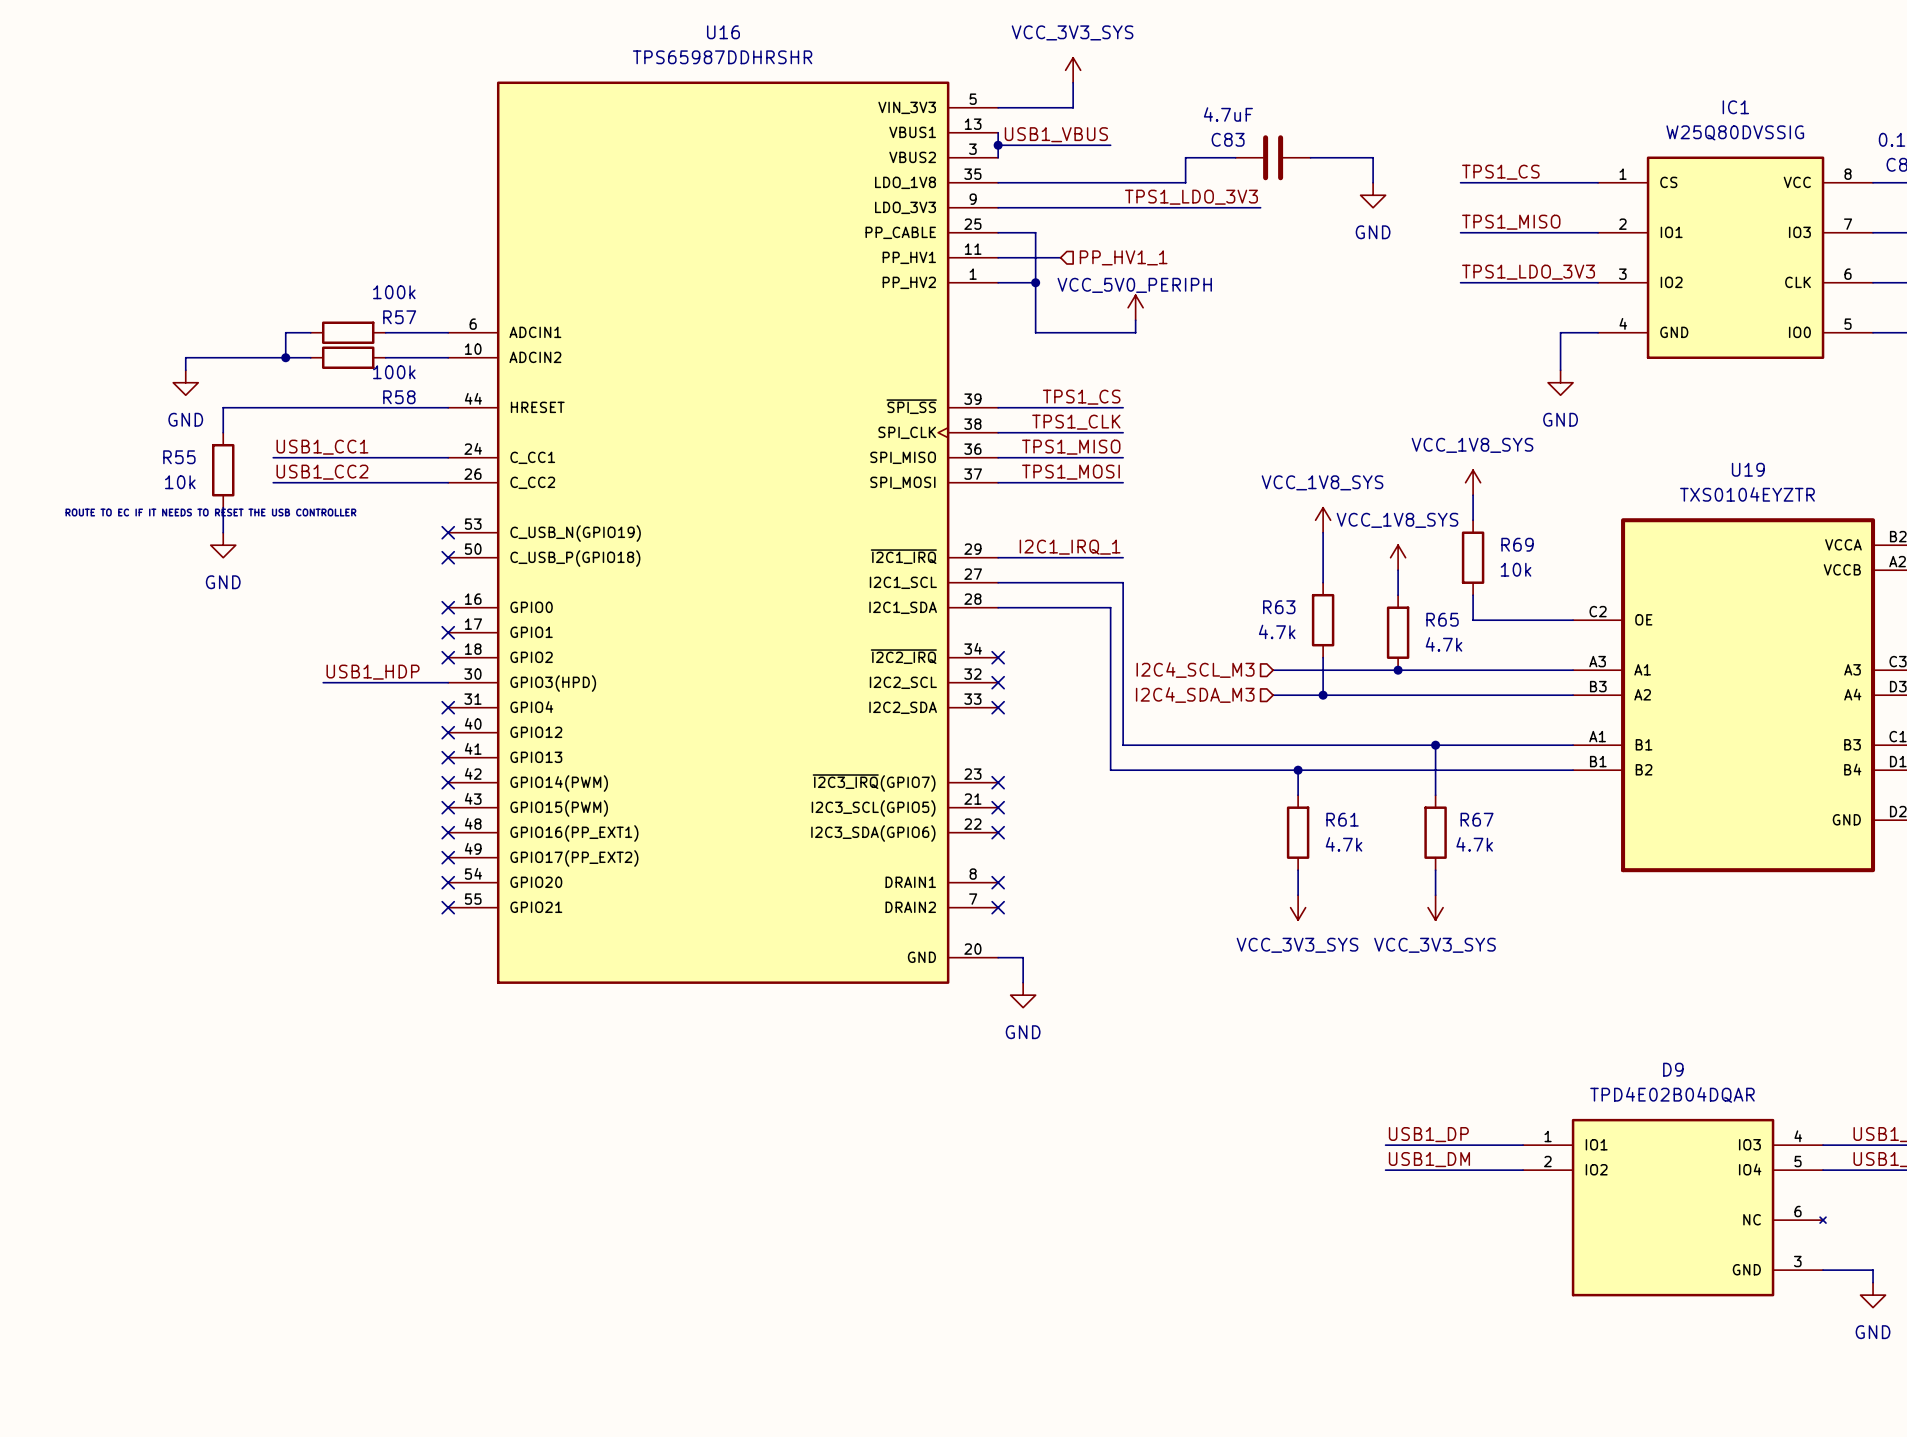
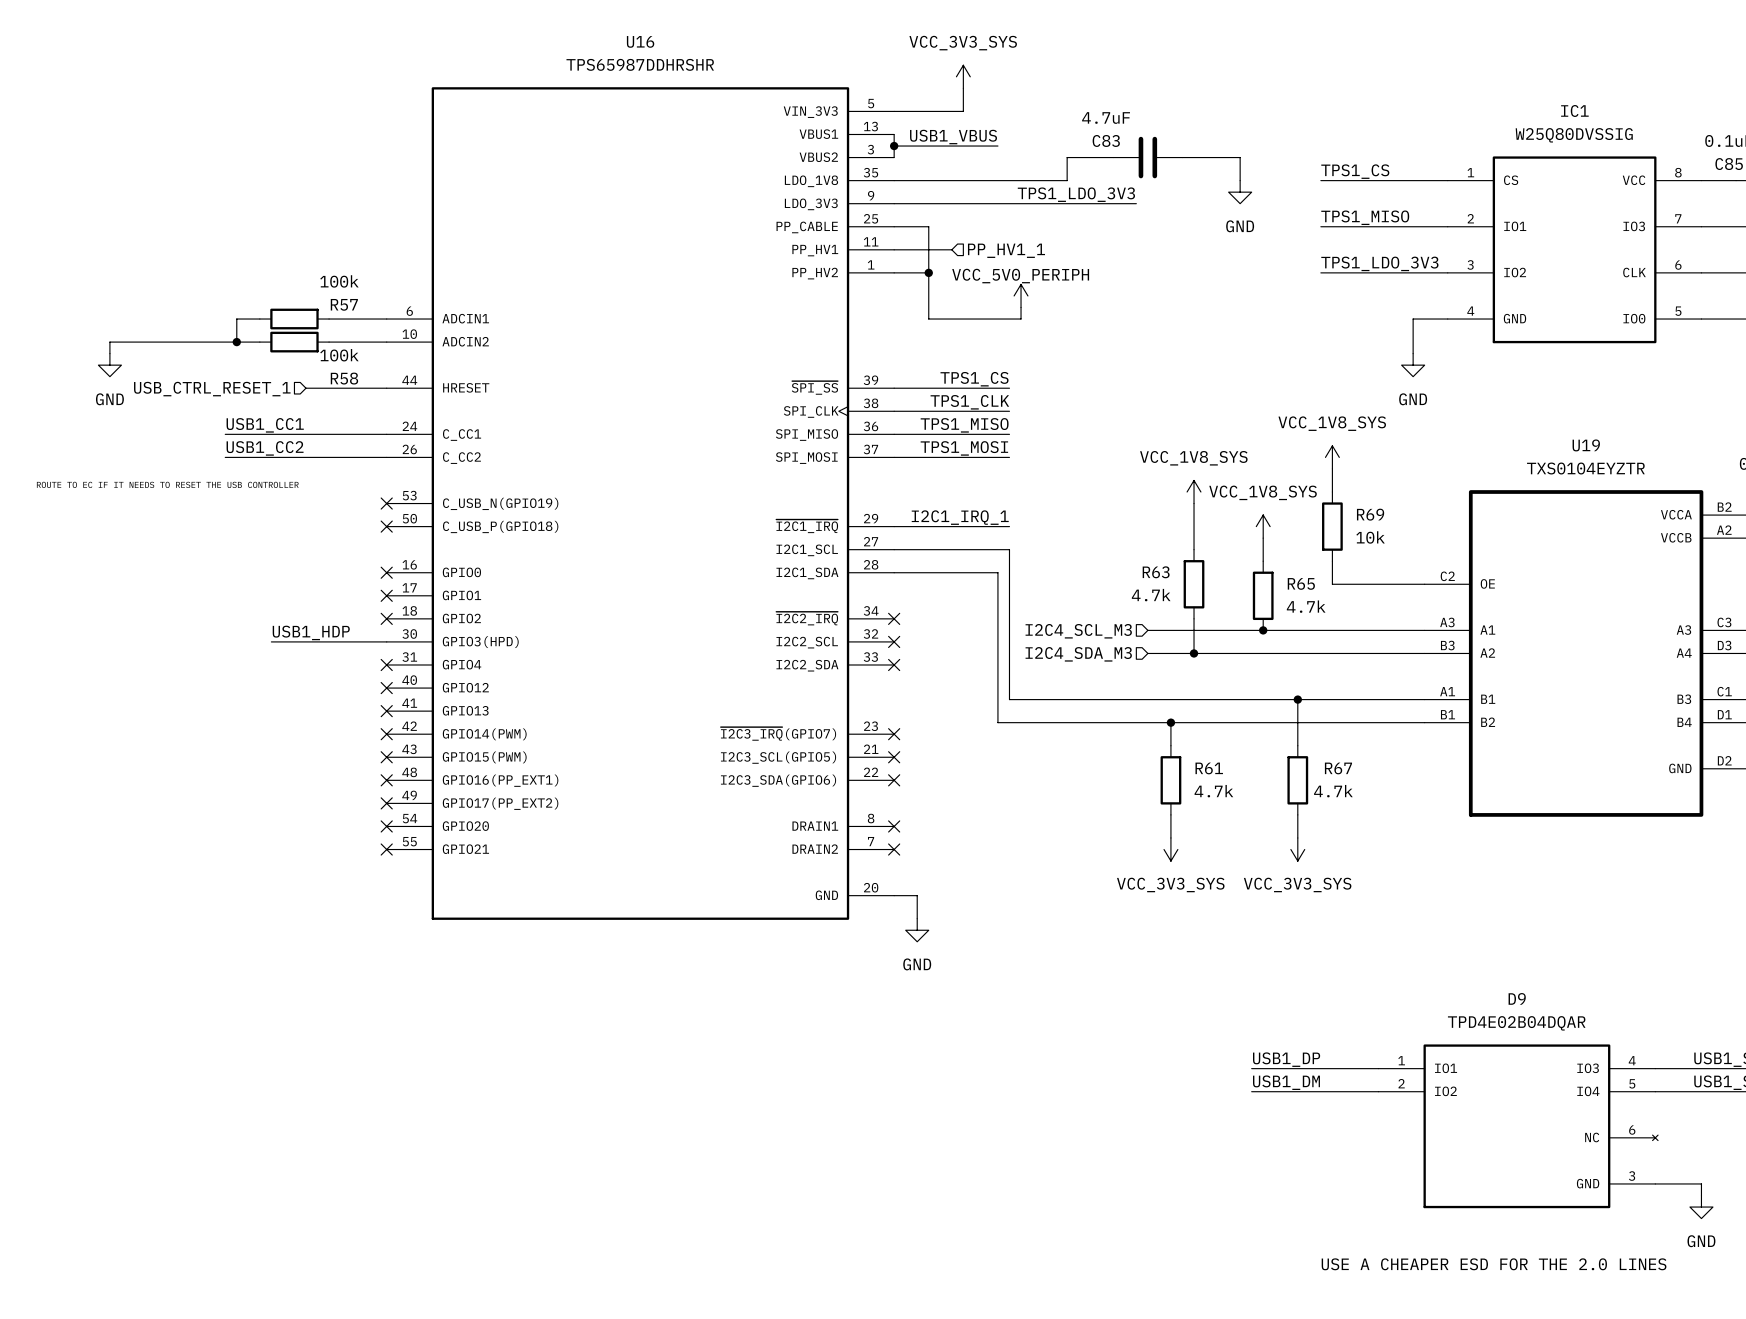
wire: (185, 357) (185, 370) -> (144, 342) (109, 342) (109, 353)
power symbol position: GND (185, 382) -> GND (109, 365)
hierarchical label: none -> USB_CTRL_RESET_1 (212, 389)
wire: (360, 407) (223, 407) (223, 432) -> none
R55: 10k (223, 470) -> none
wire: (223, 507) (223, 532) -> none
power symbol: GND (223, 545) -> none
text: none -> USE A CHEAPER ESD FOR THE 2.0 LINES (1494, 1264)

